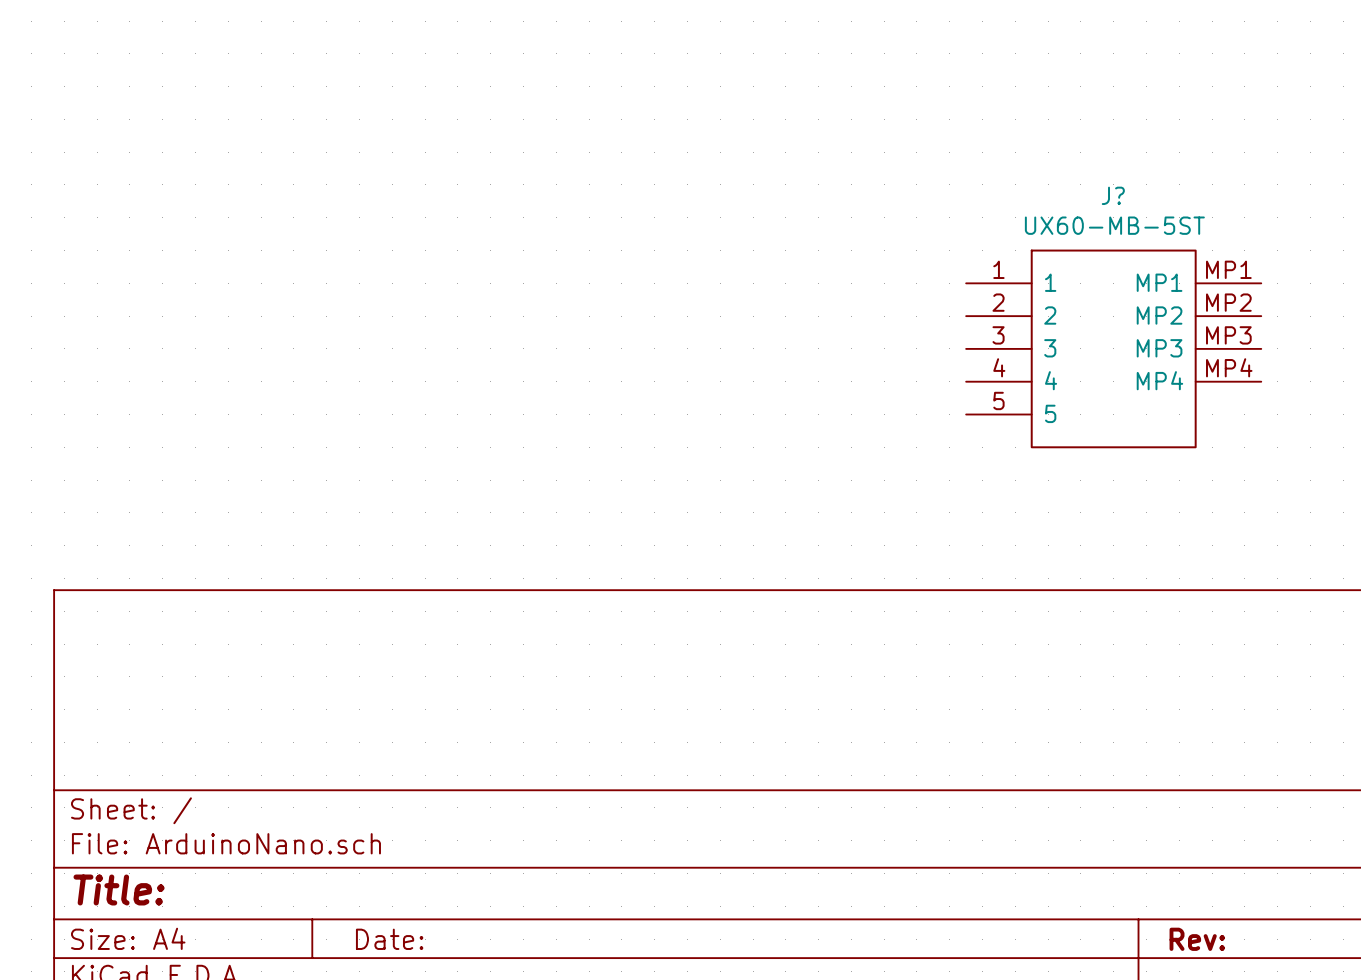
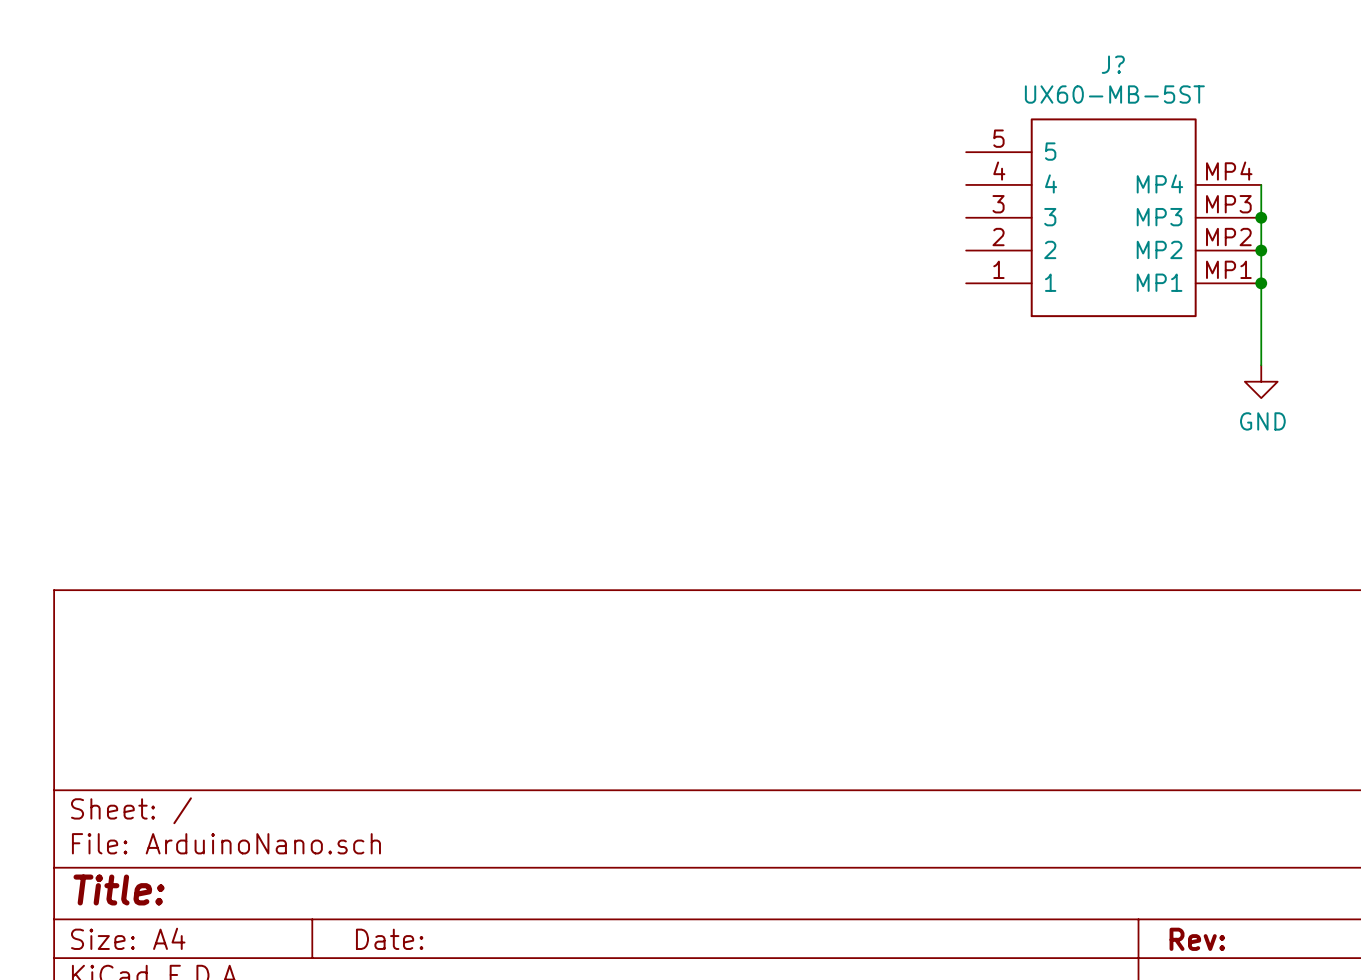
wire: none -> (1261, 184) (1261, 365)
J?: none -> UX60-MB-5ST (1113, 217)
junction: none -> (1261, 217)
junction: none -> (1261, 250)
junction: none -> (1261, 283)
J?: UX60-MB-5ST (1113, 348) -> none
power symbol: none -> GND (1261, 381)

